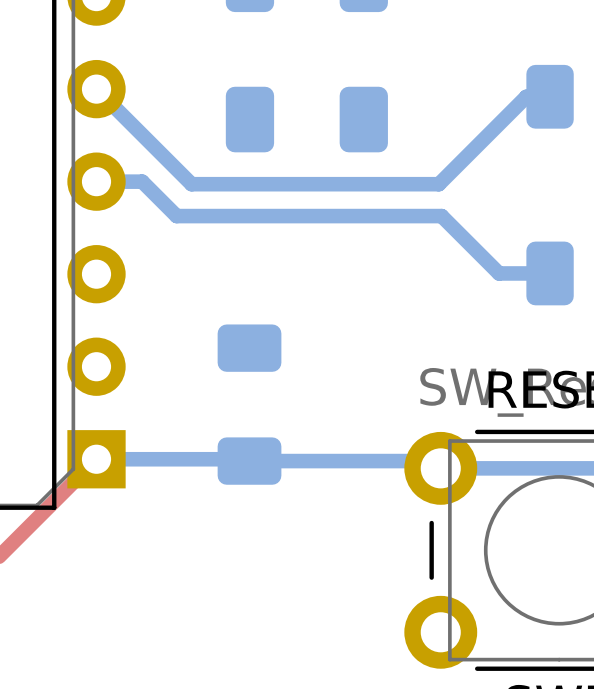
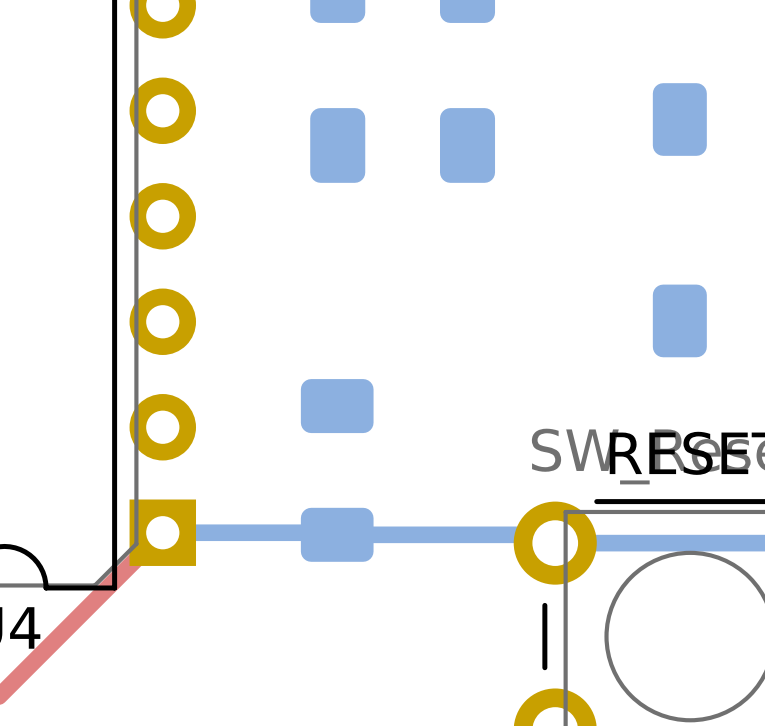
bottom track: (96, 89) (191, 184) (438, 184) (526, 96) (550, 96) -> none
bottom track: (96, 181) (142, 181) (176, 216) (441, 216) (499, 273) (550, 273) -> none

